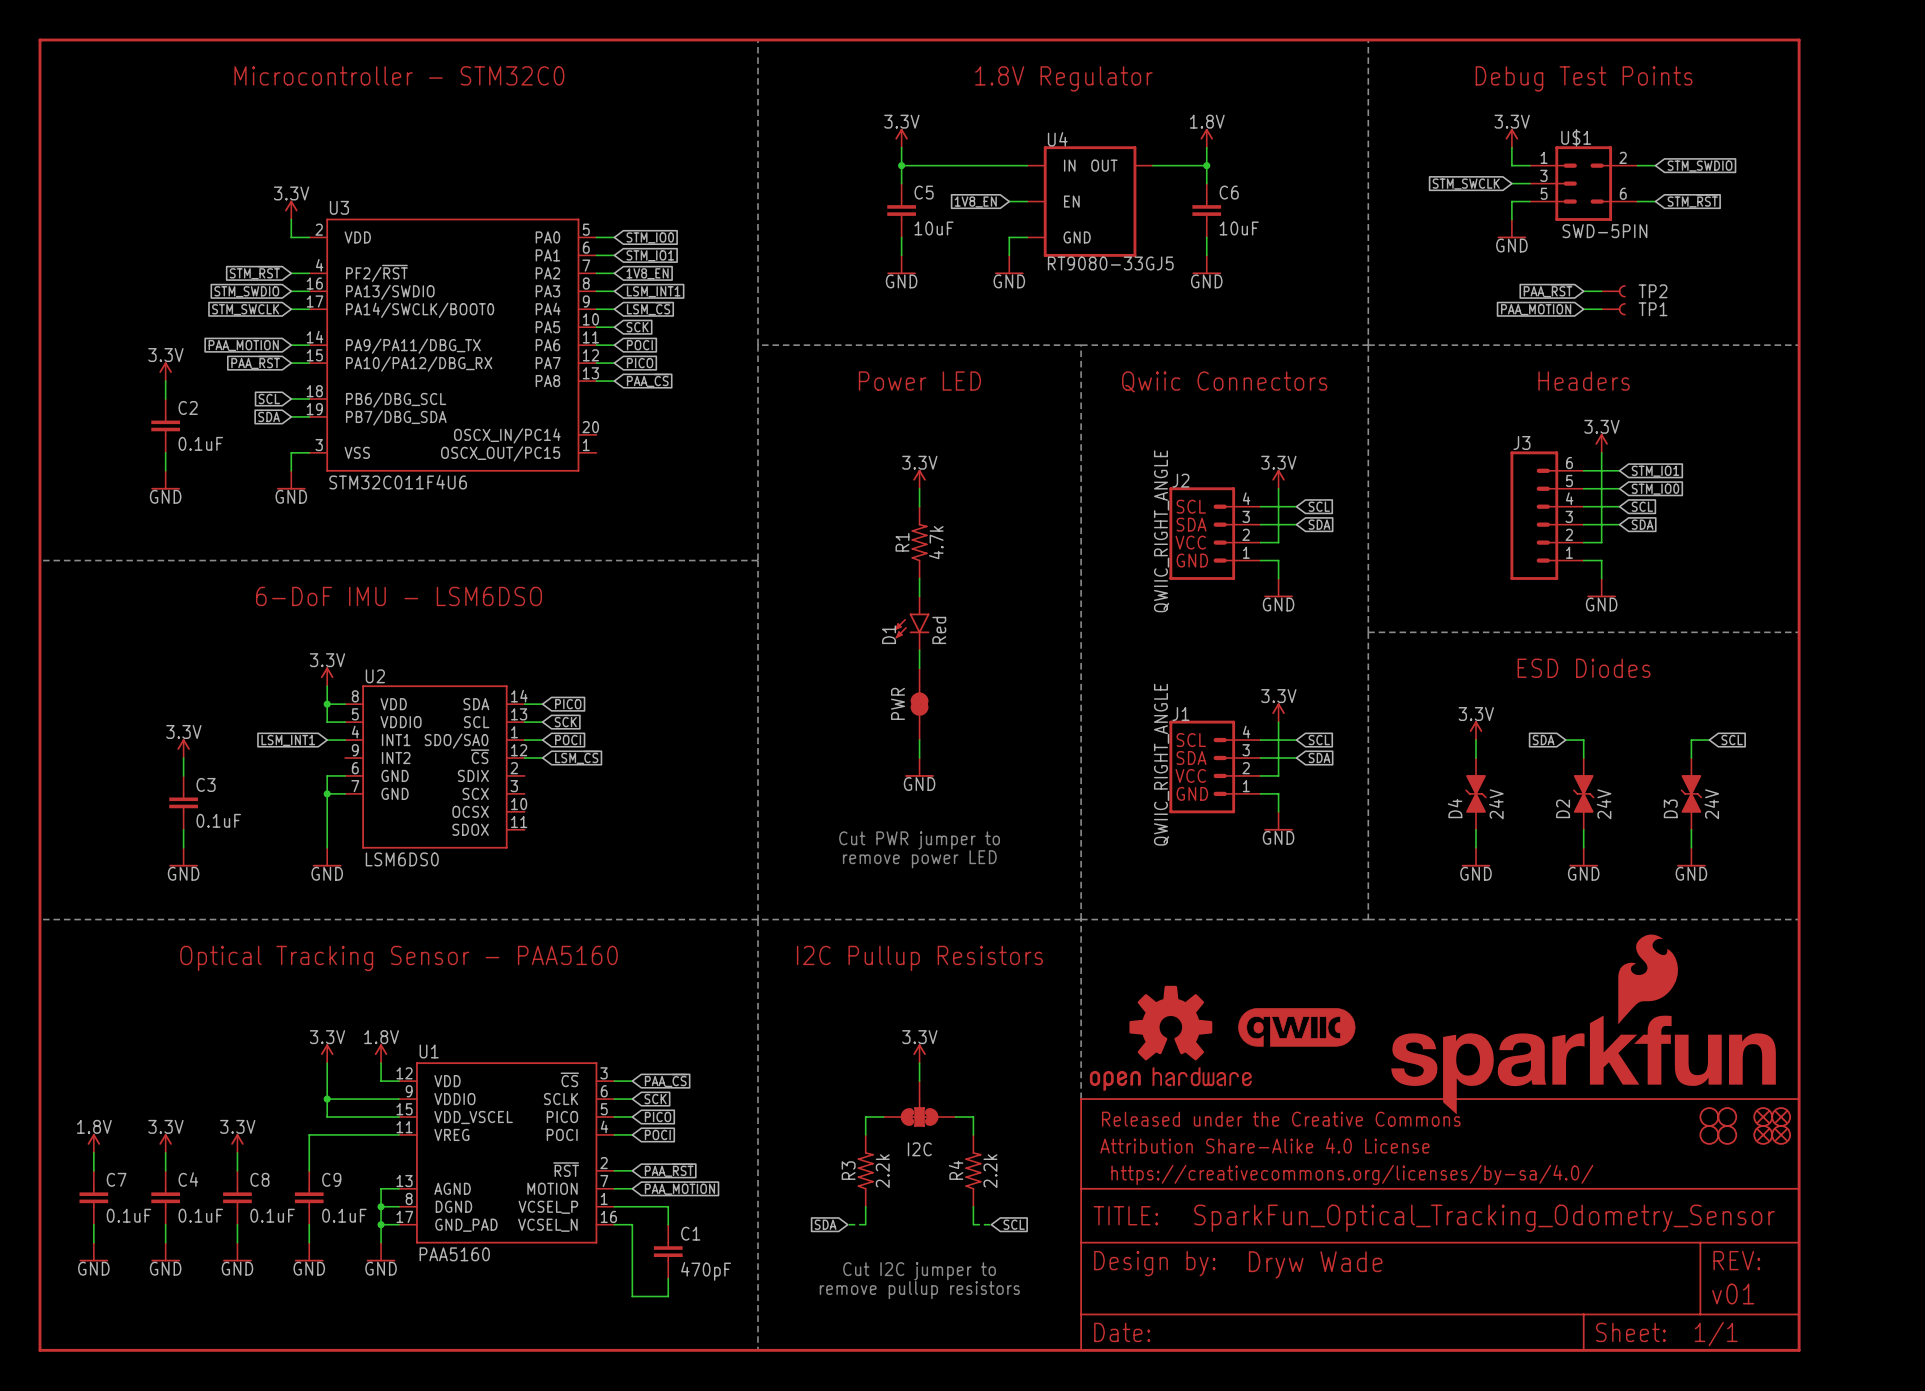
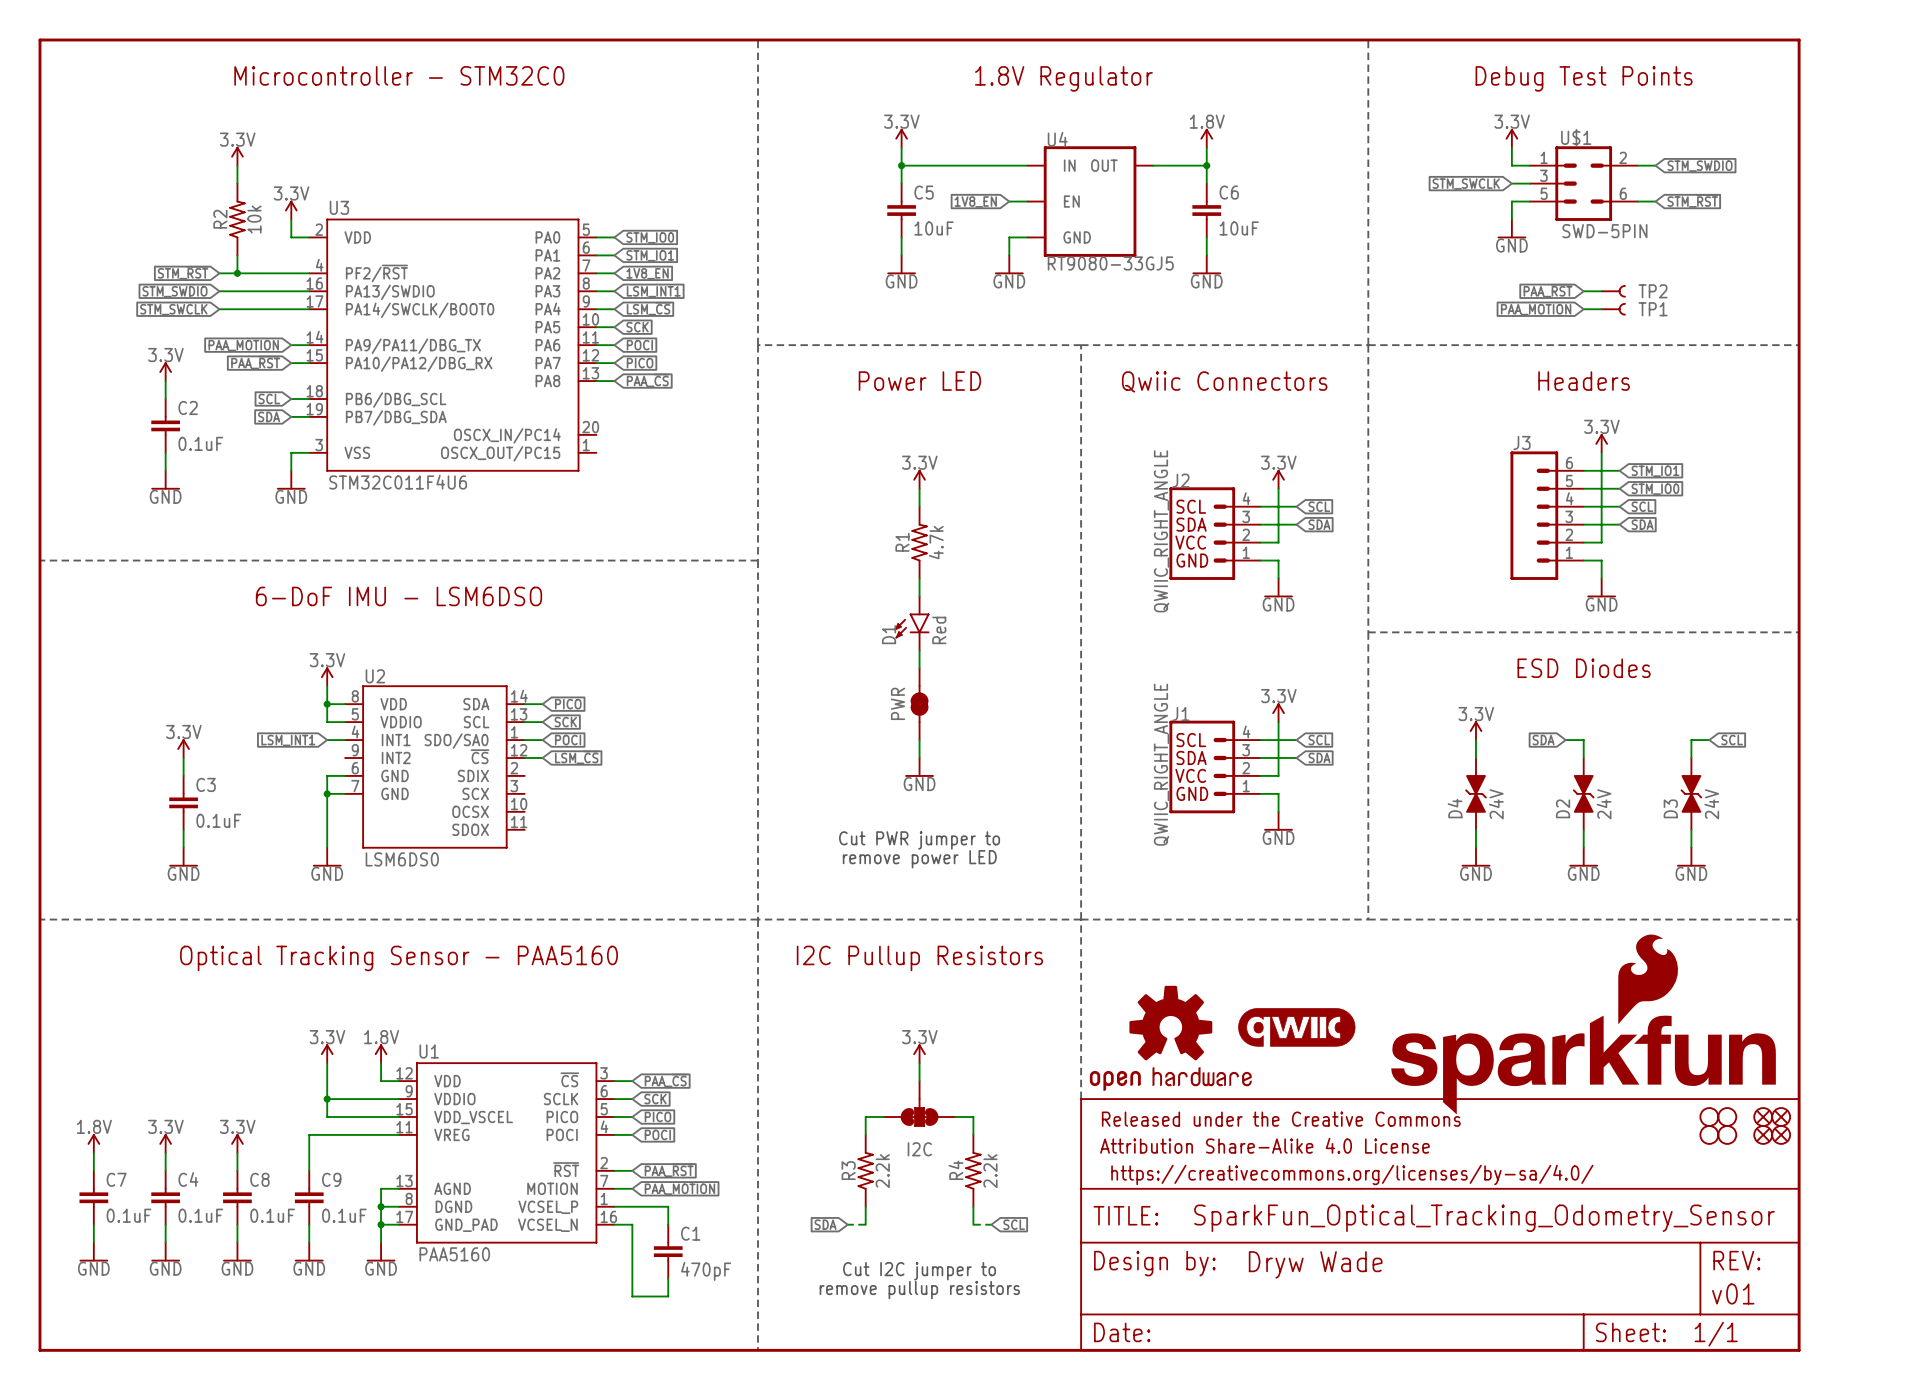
power symbol: none -> 3.3V (237, 156)
wire: none -> (237, 165) (237, 183)
R2: none -> 10k (237, 219)
wire: none -> (237, 255) (237, 273)
global label position: STM_~{RST} (254, 272) -> STM_~{RST} (183, 272)
wire: none -> (219, 273) (291, 273)
junction: none -> (237, 273)
wire: none -> (219, 291) (291, 291)
global label position: STM_SWDIO (246, 291) -> STM_SWDIO (174, 291)
wire: none -> (219, 309) (291, 309)
global label position: STM_SWCLK (245, 309) -> STM_SWCLK (173, 309)

